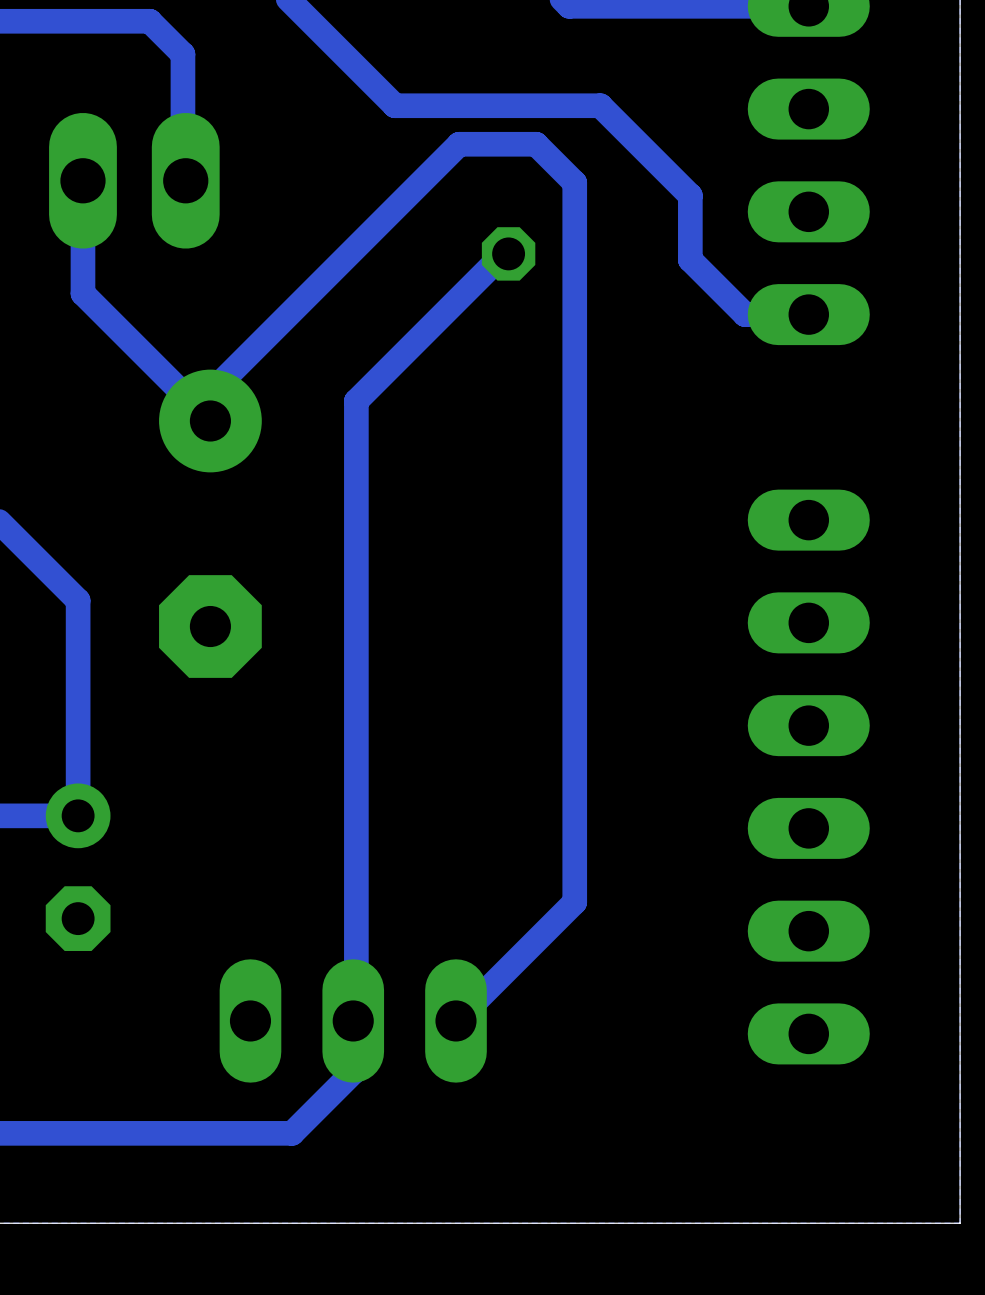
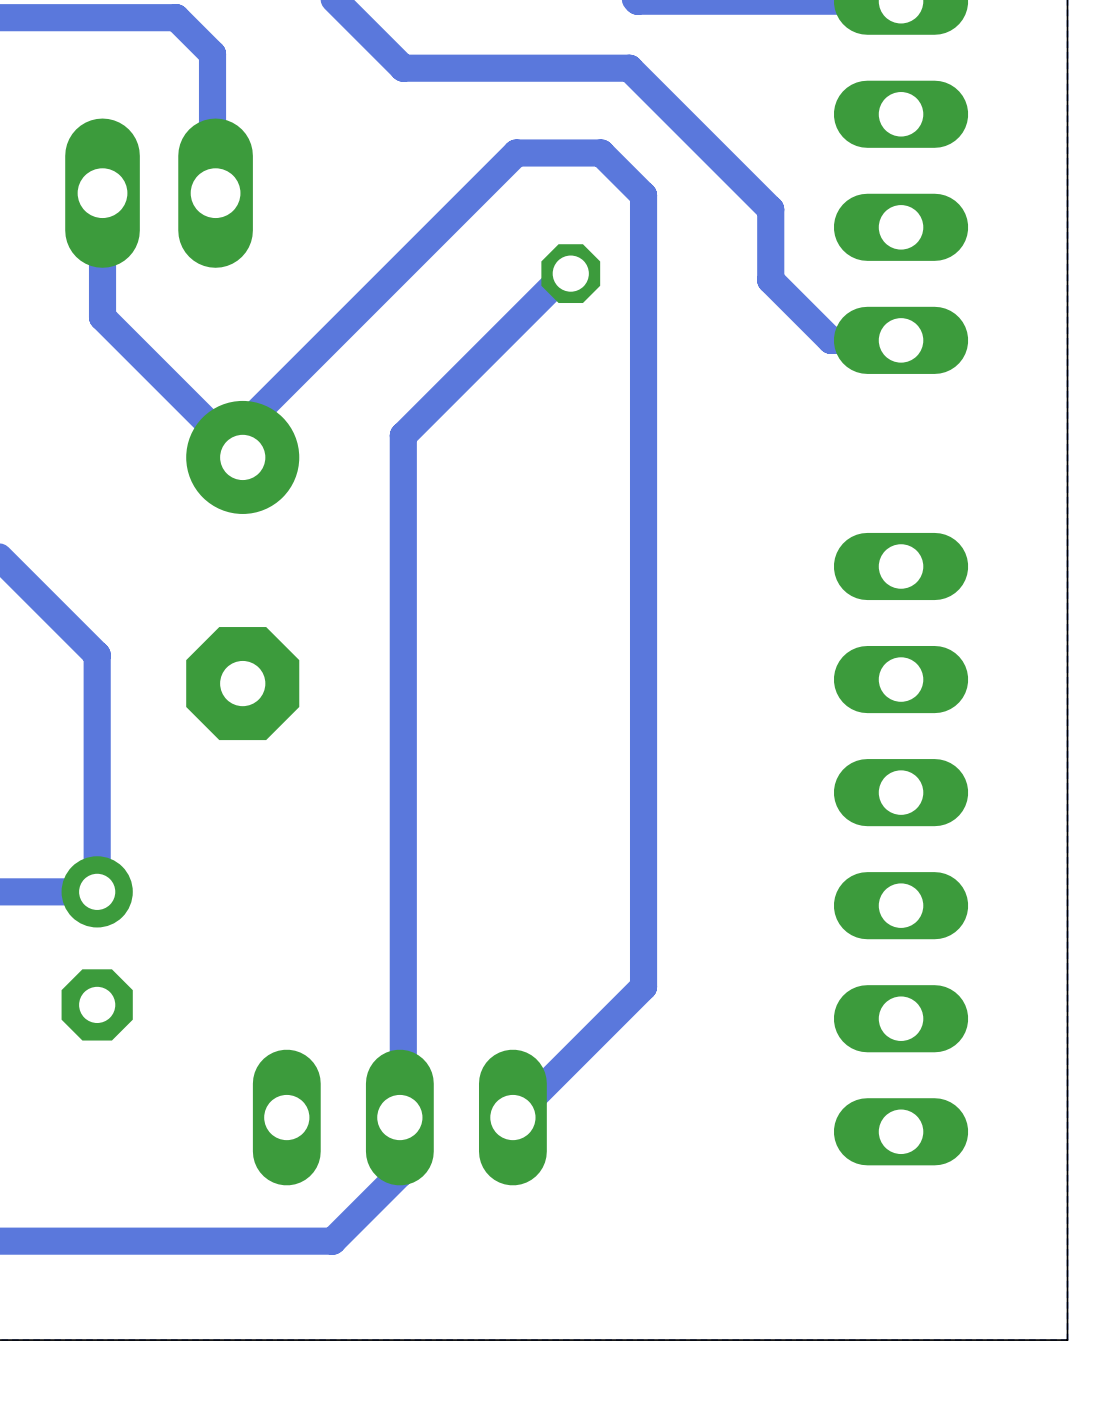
track: (356, 67) (394, 105) (600, 105) -> (403, 68) (629, 68) (671, 110)

